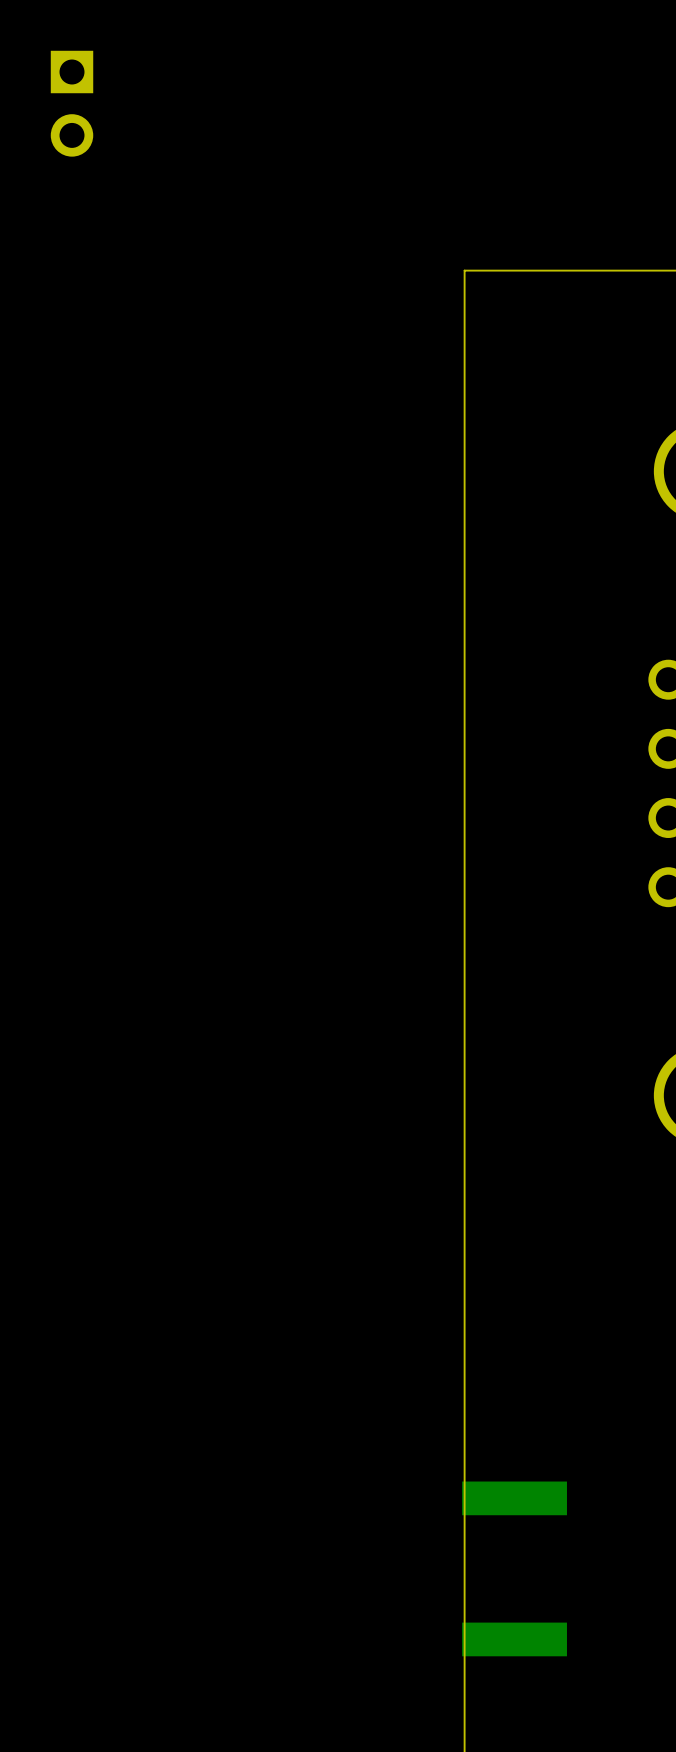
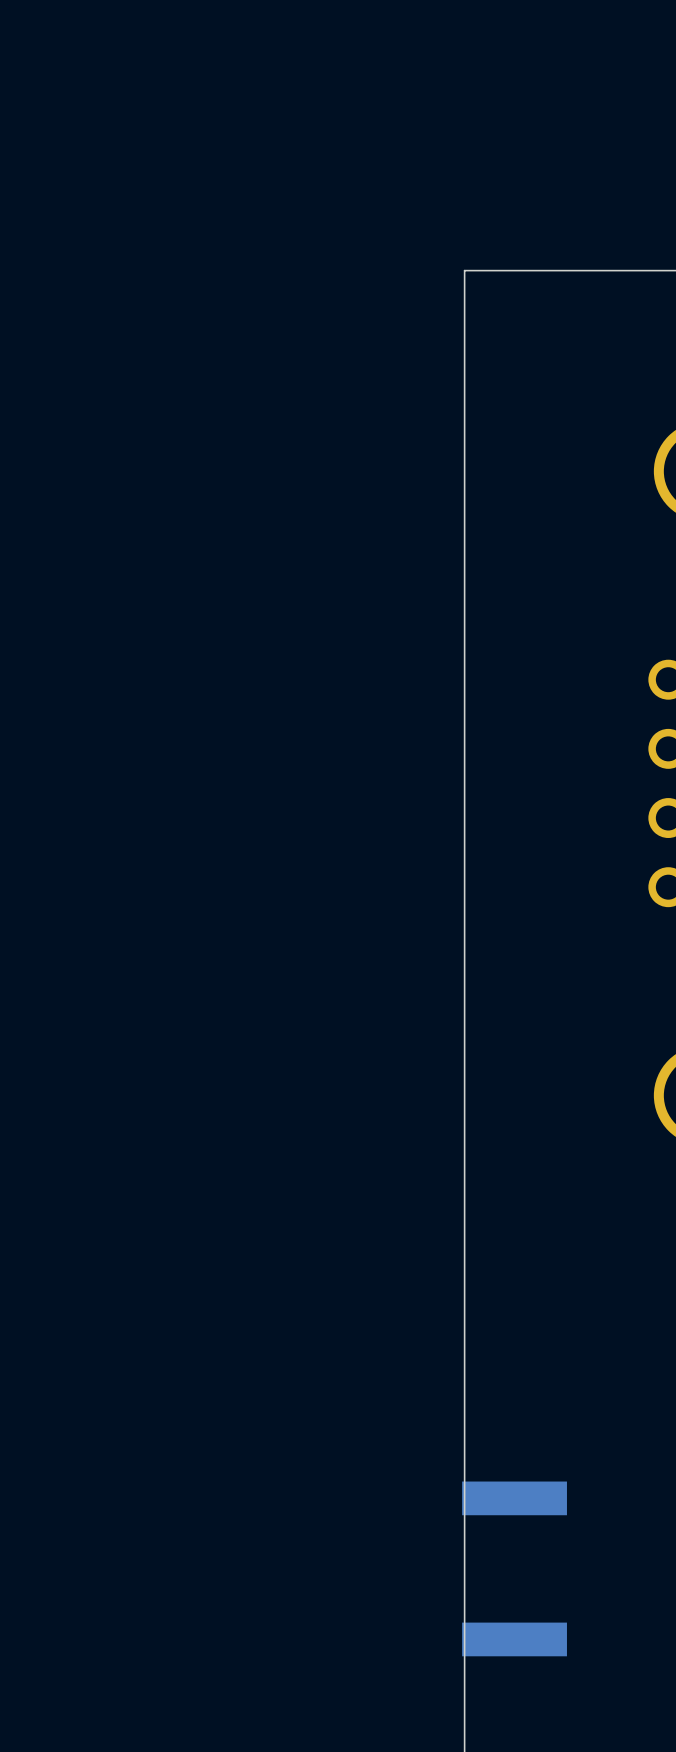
part: (72, 103) -> none

